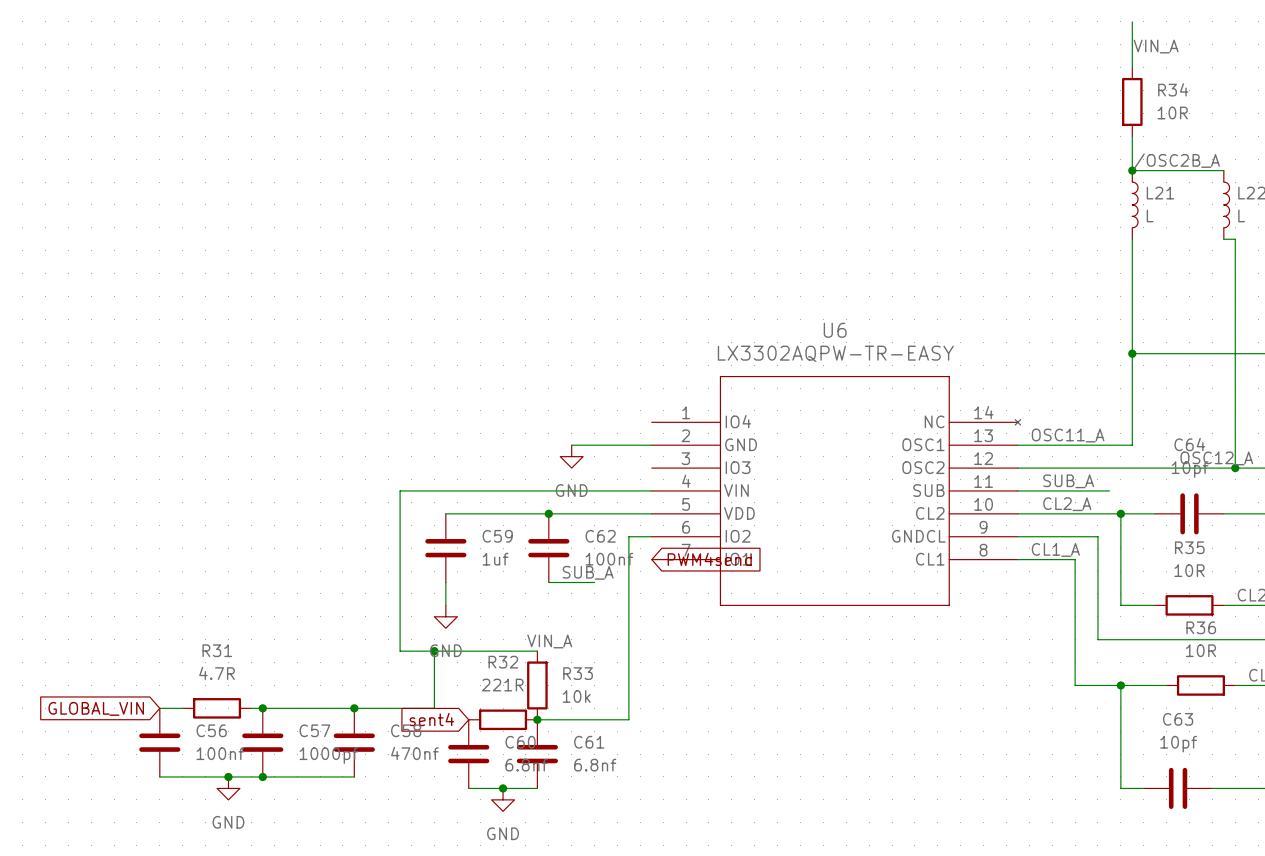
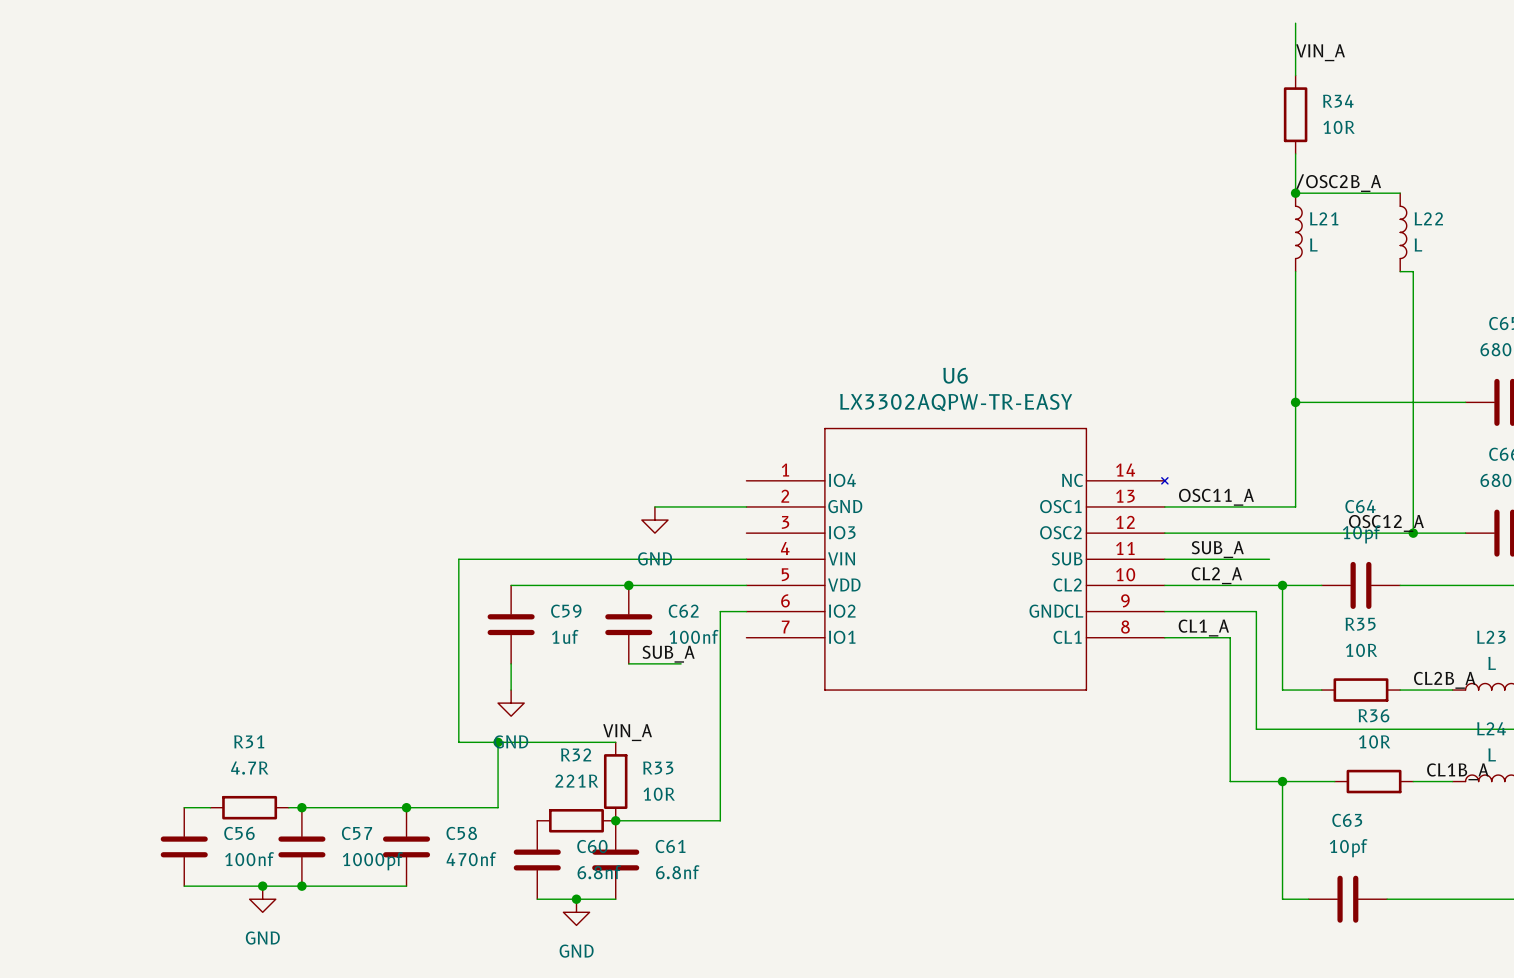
global label: PWM4send (709, 559) -> none
R33 value: 10k (576, 696) -> 10R (659, 794)
global label: GLOBAL_VIN (96, 708) -> none
global label: sent4 (431, 719) -> none

